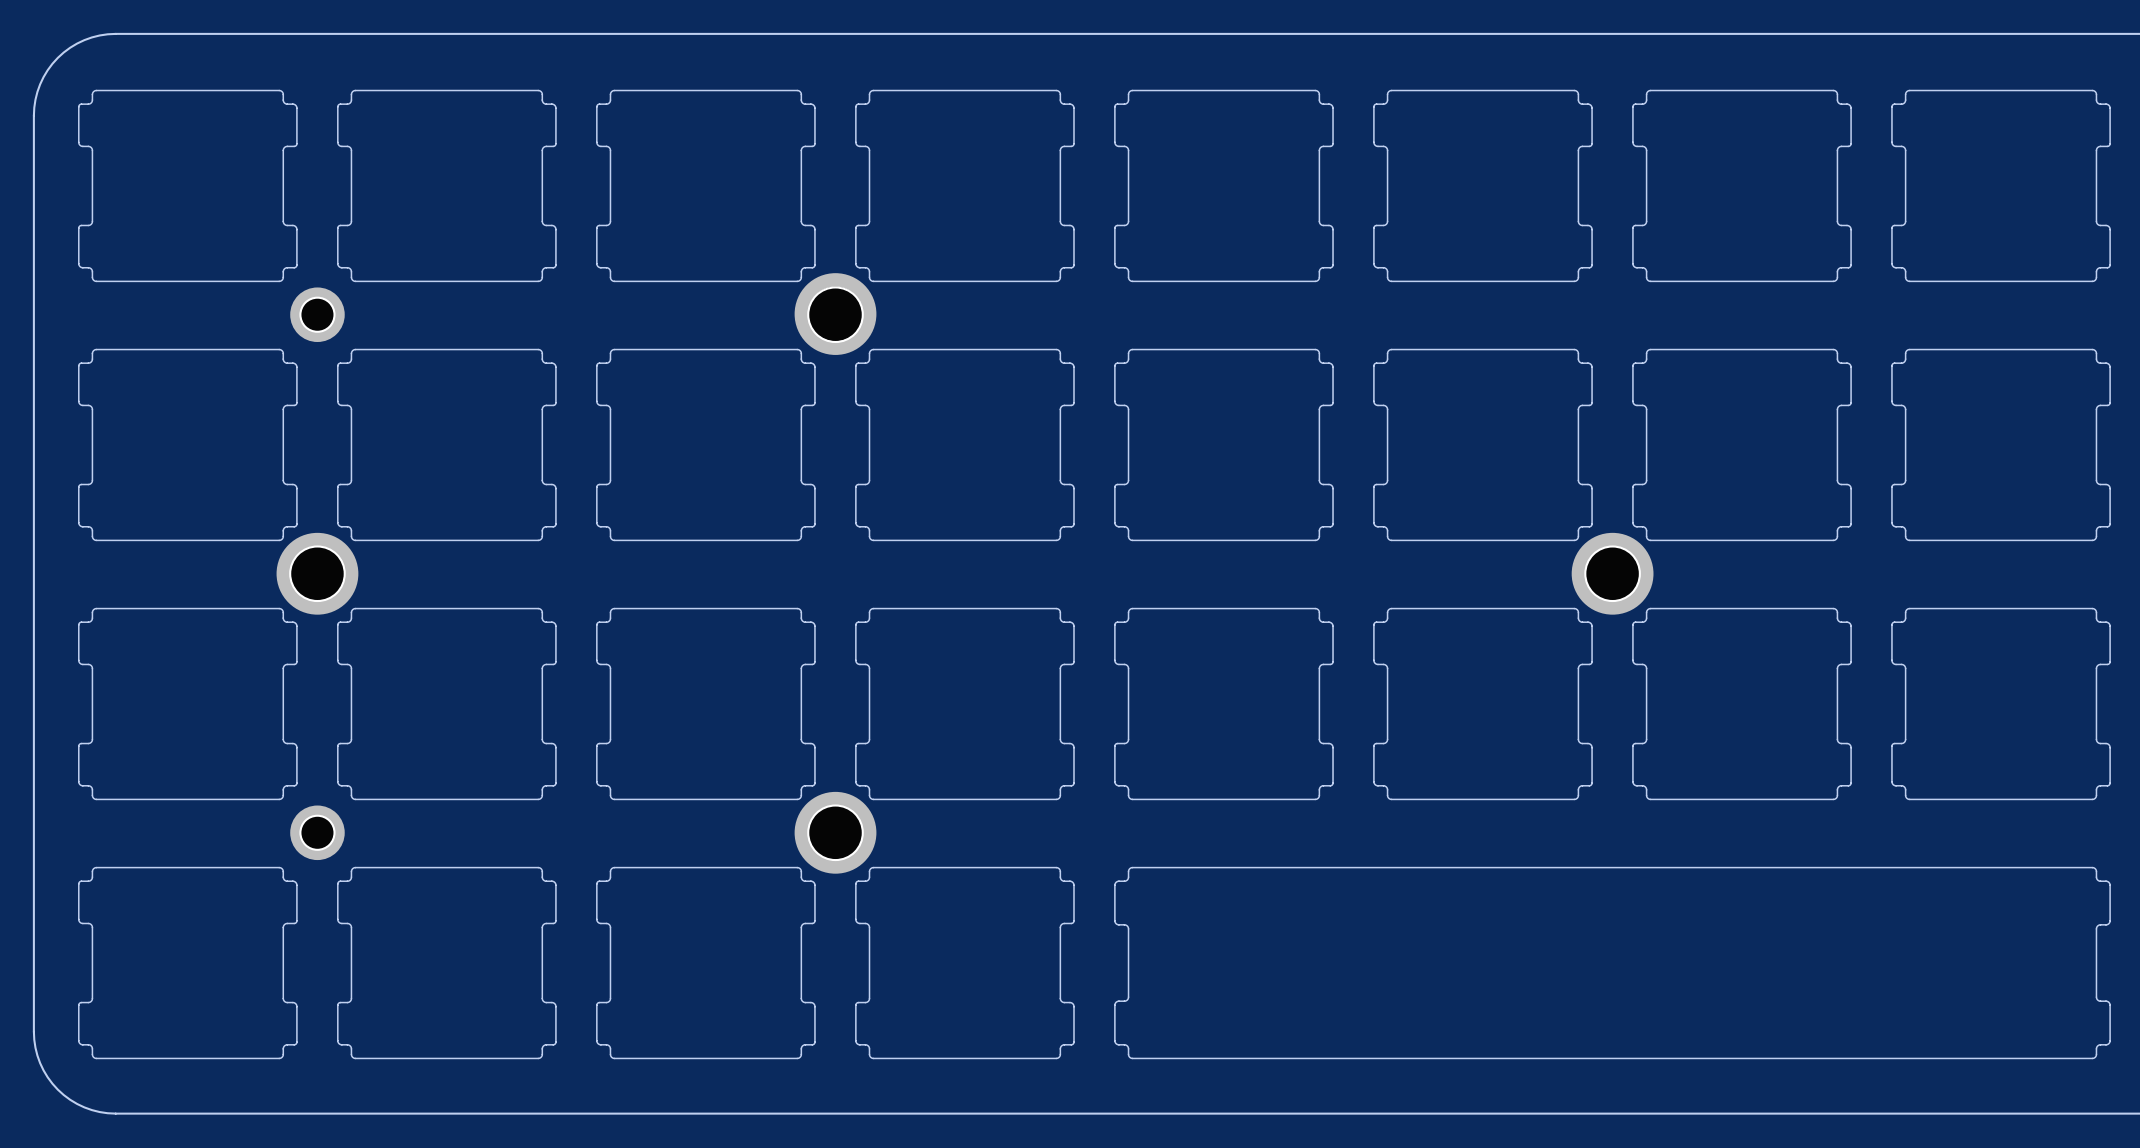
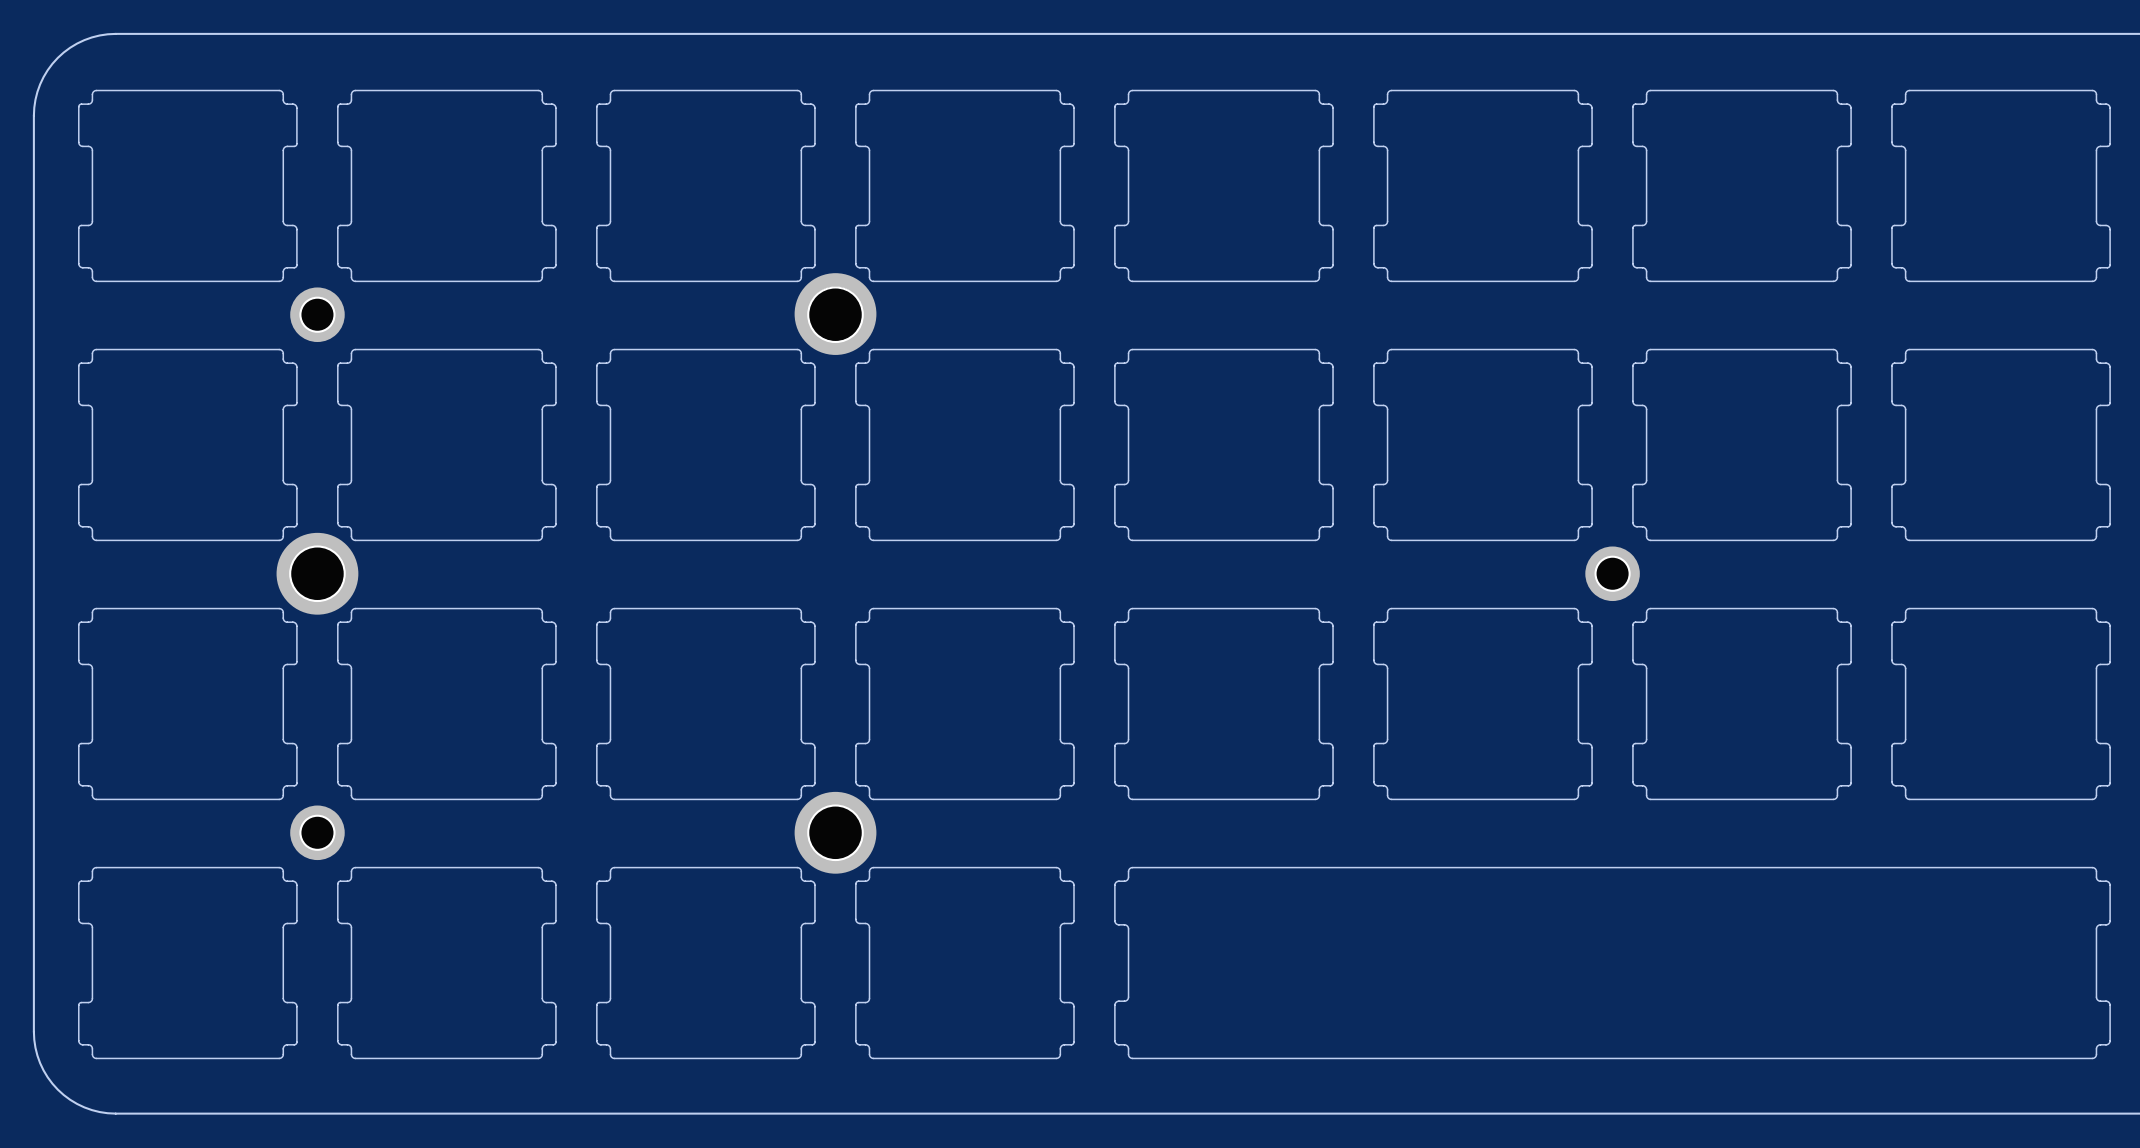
via size: [1571, 532, 1654, 615] -> [1585, 546, 1640, 602]
drawing shape: [1584, 545, 1641, 603] -> [1594, 555, 1631, 592]

